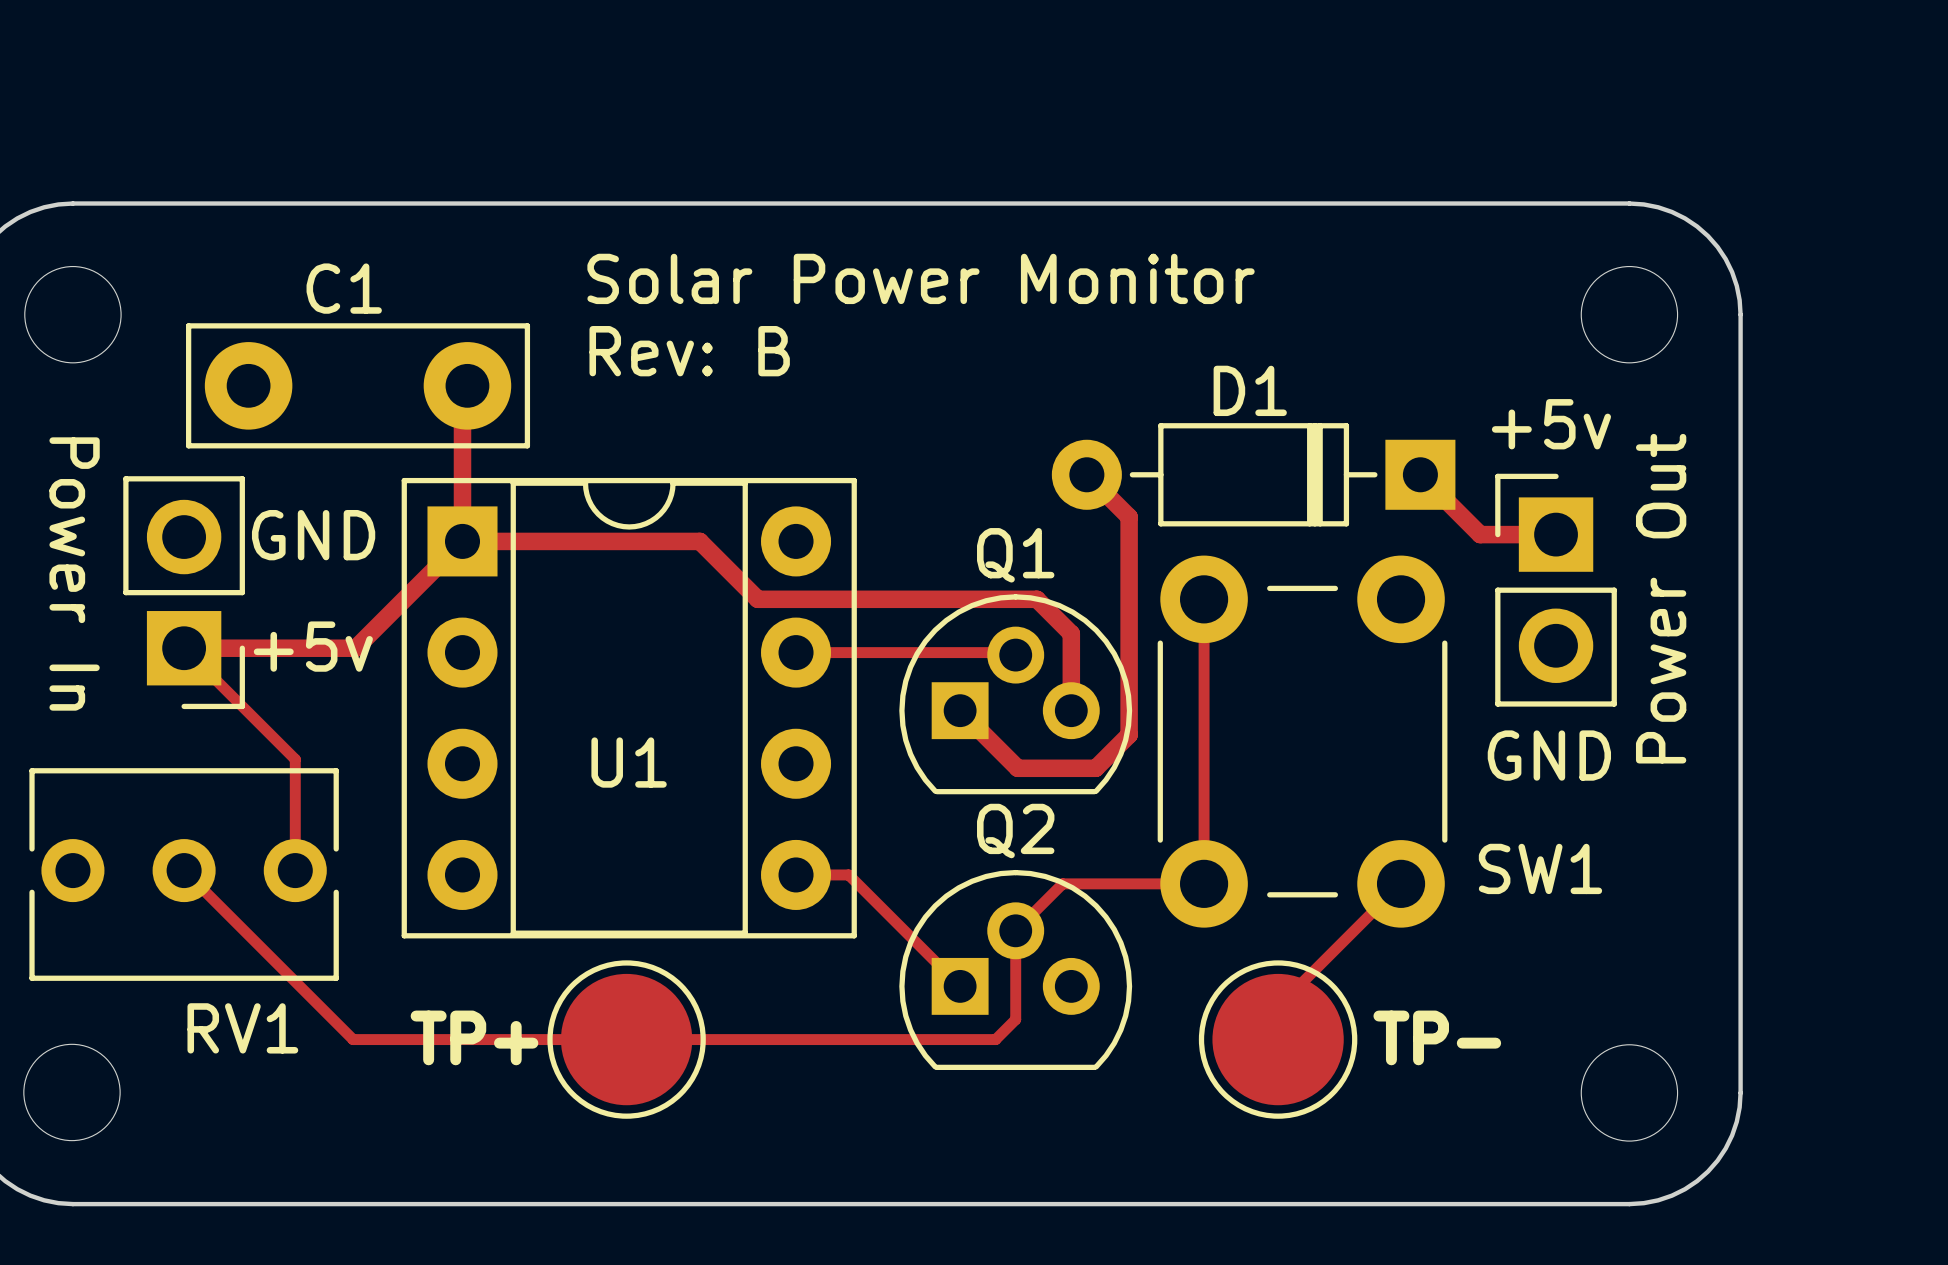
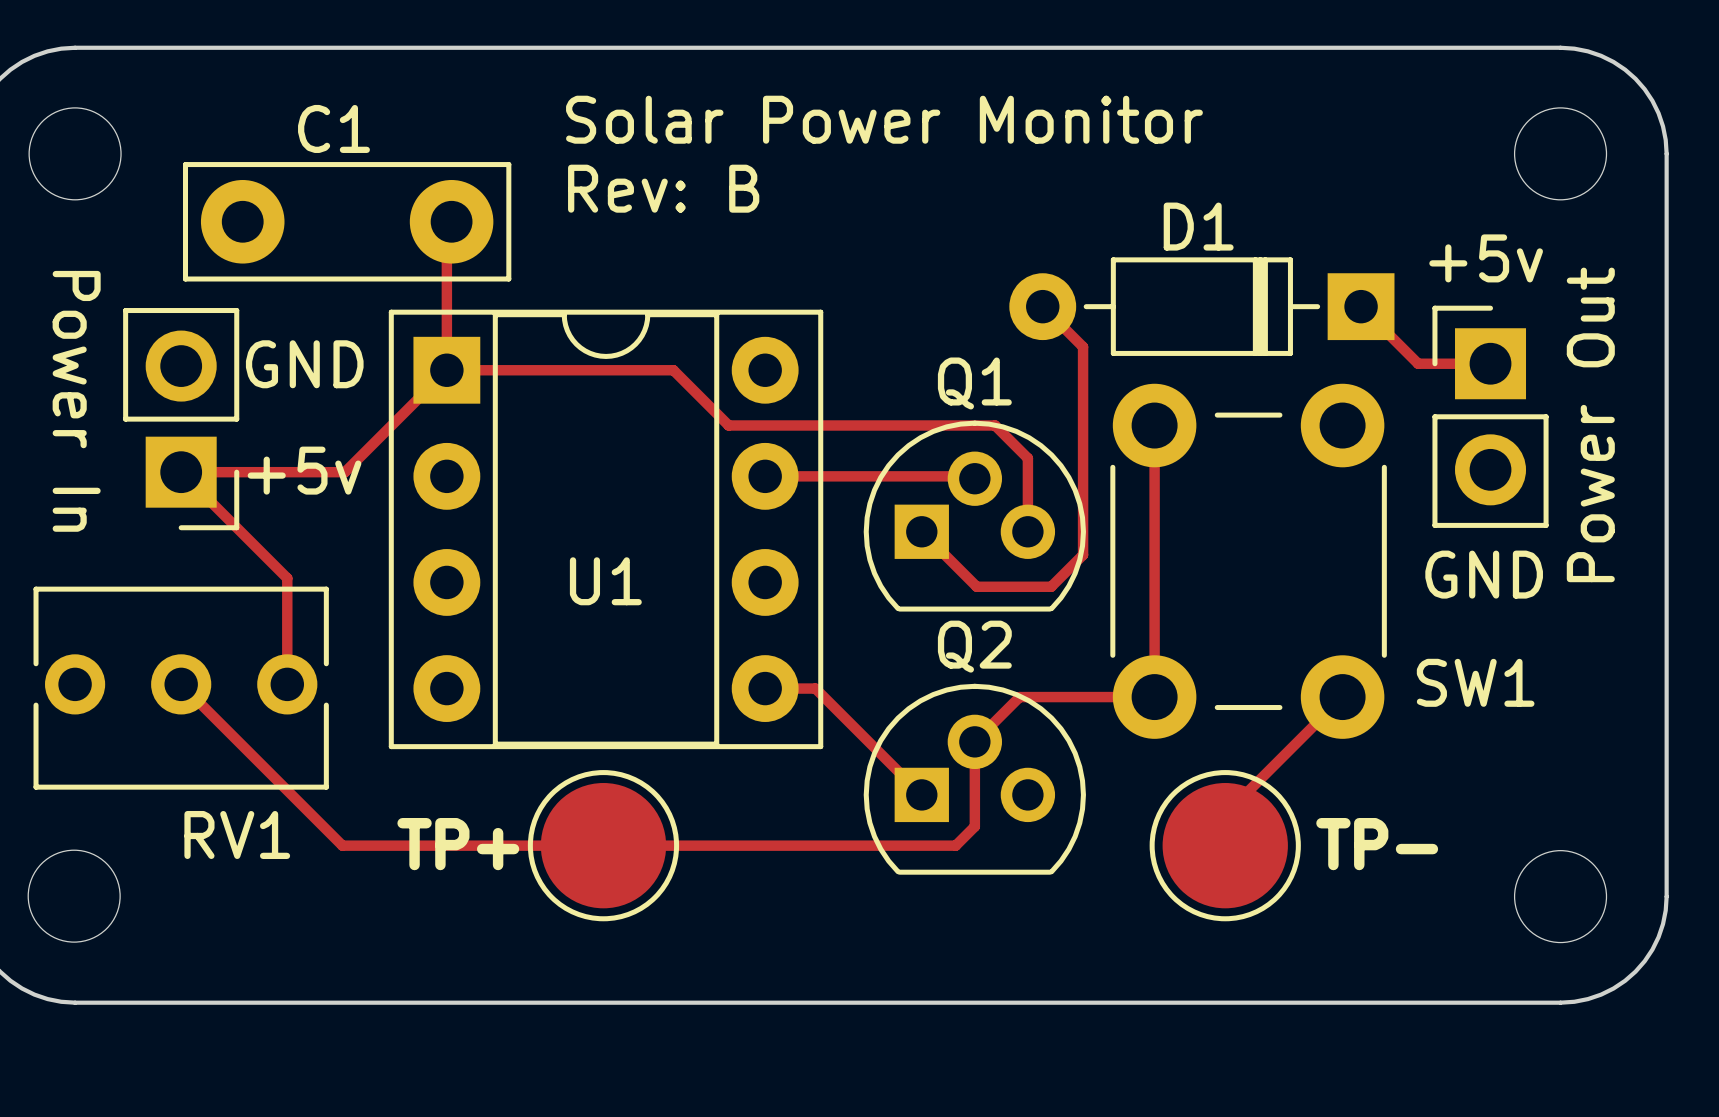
track width: thick (462, 390) (462, 541) -> thin (446, 225) (446, 370)
track width: thick (1086, 474) (1129, 517) (1129, 734) (1095, 768) (1017, 768) (960, 710) -> thin (1042, 306) (1083, 346) (1083, 554) (1051, 586) (976, 586) (921, 531)
track width: thick (1420, 474) (1480, 534) (1556, 534) -> thin (1361, 306) (1418, 363) (1490, 363)
track width: thick (462, 541) (699, 541) (757, 599) (1036, 599) (1071, 633) (1071, 710) -> thin (446, 370) (673, 370) (728, 425) (995, 425) (1027, 458) (1027, 531)
track width: thick (462, 541) (355, 648) (184, 648) -> thin (446, 370) (344, 472) (181, 472)

